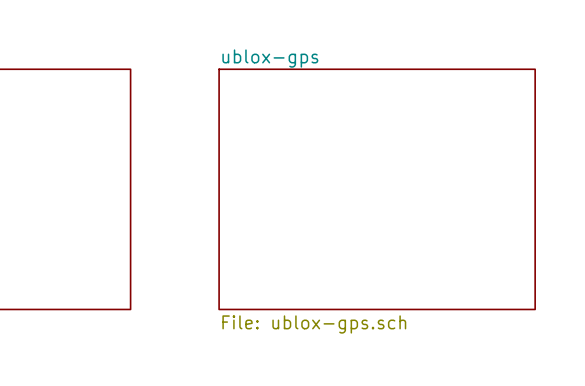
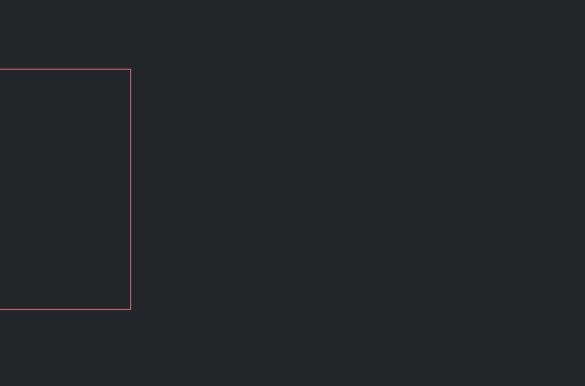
sheet ublox-gps: File: ublox-gps.sch (377, 189) -> none

